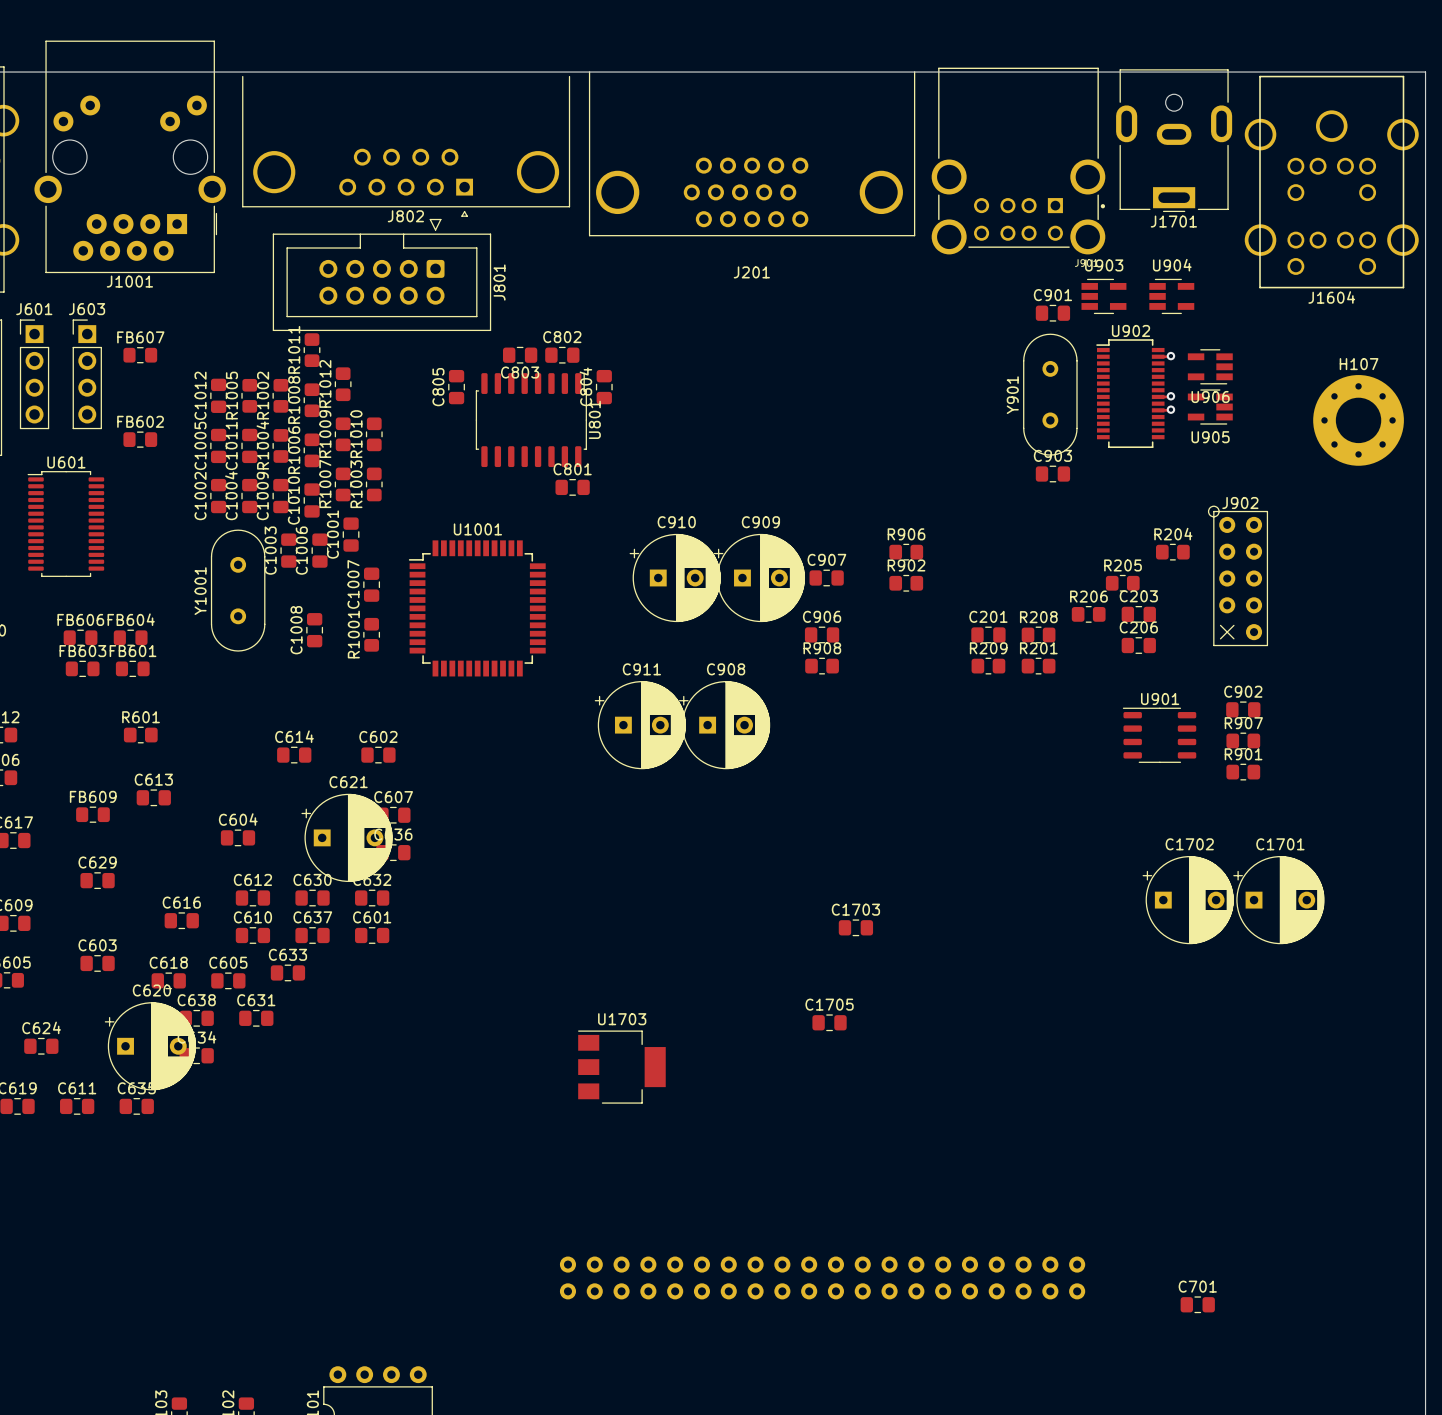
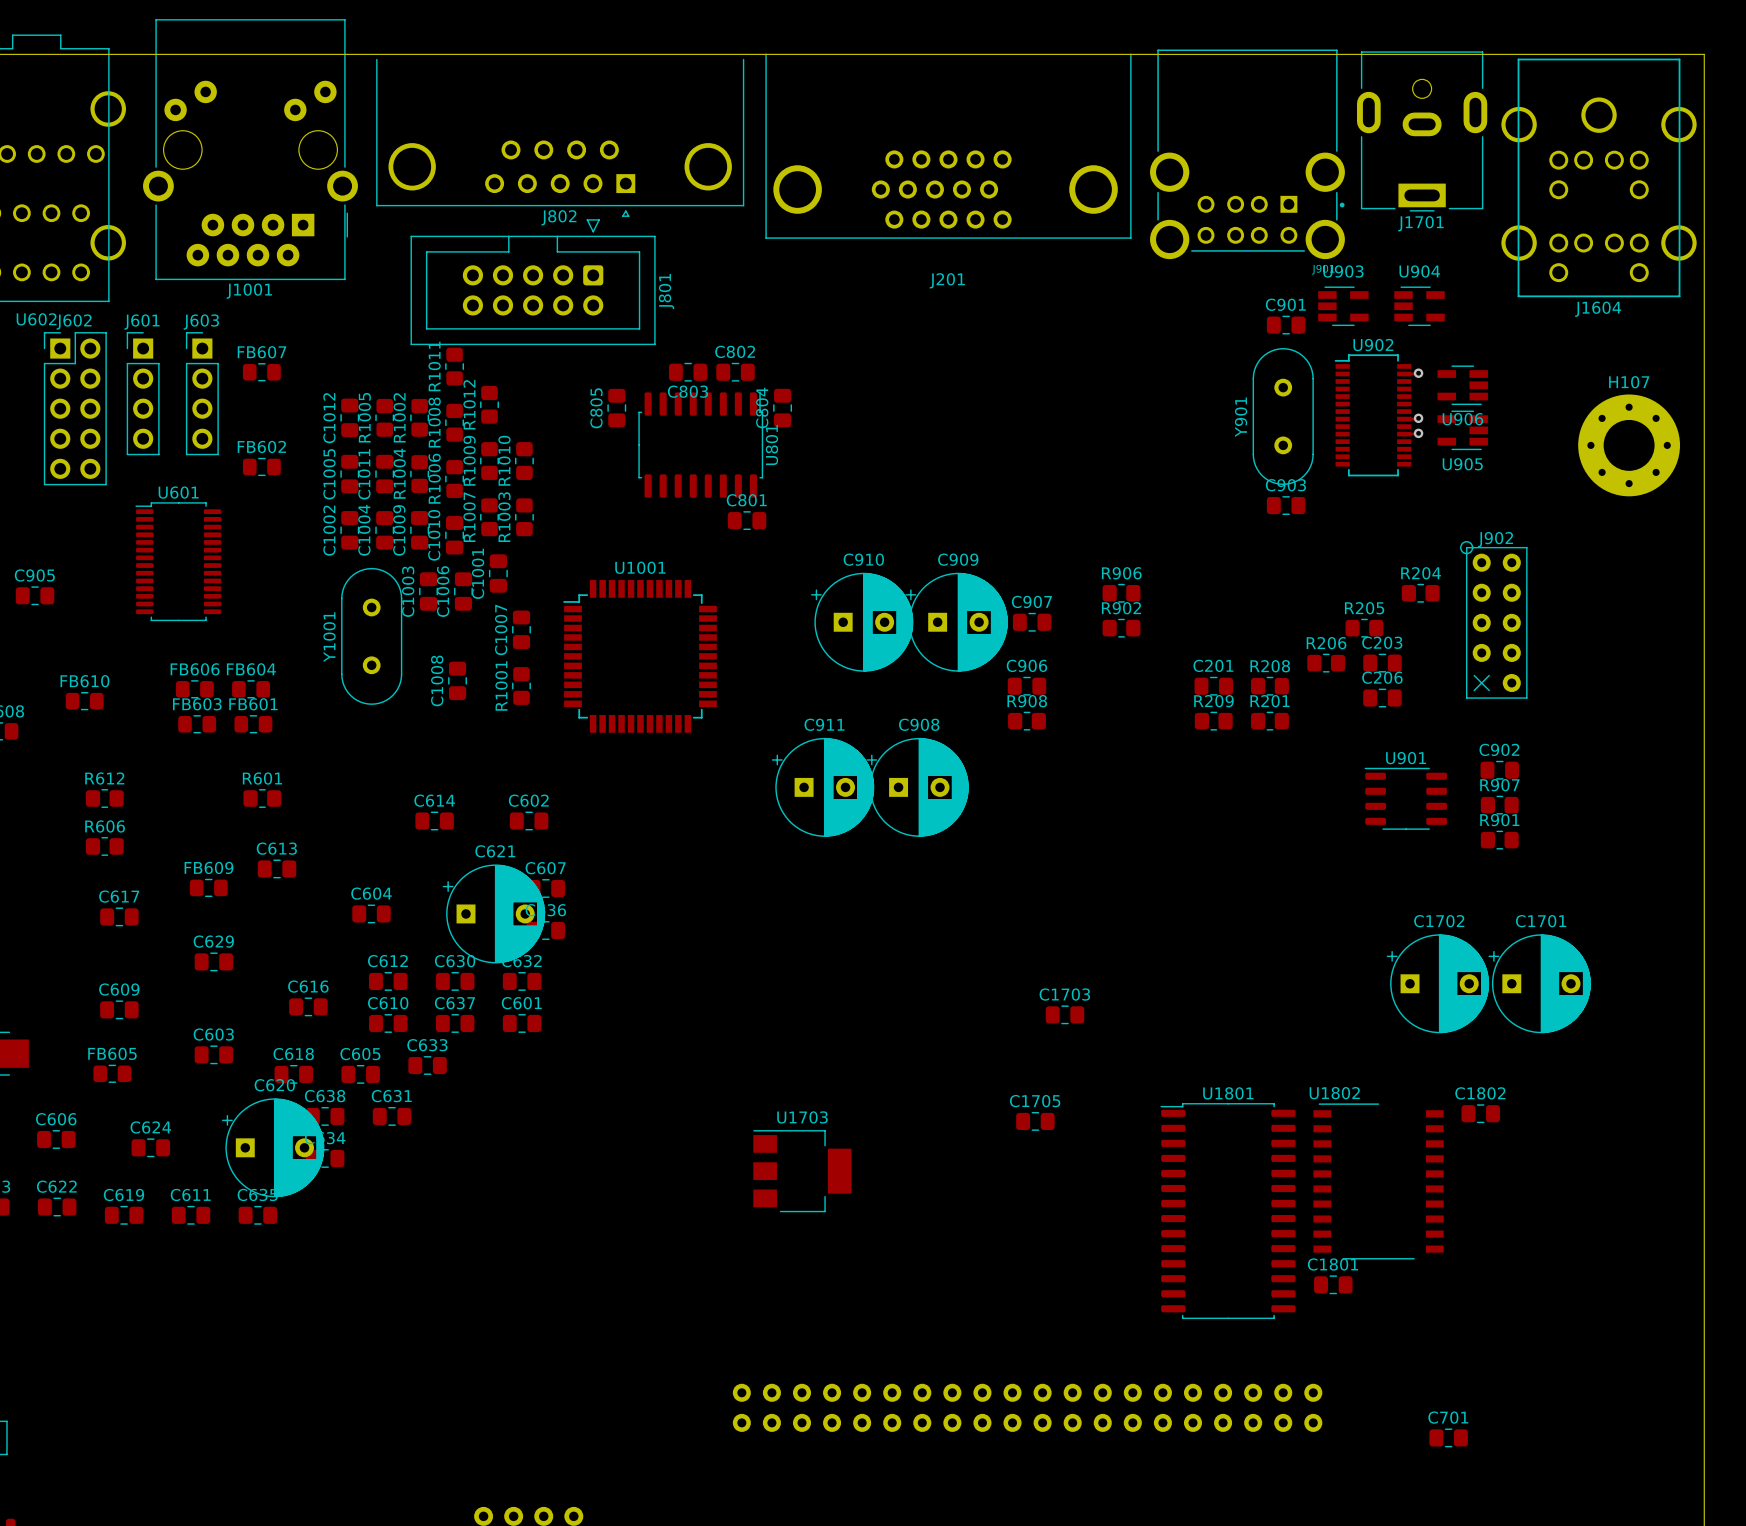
C1802: none -> (1480, 1113)
U1802: none -> (1378, 1181)
U1801: none -> (1228, 1211)
C1801: none -> (1333, 1284)

